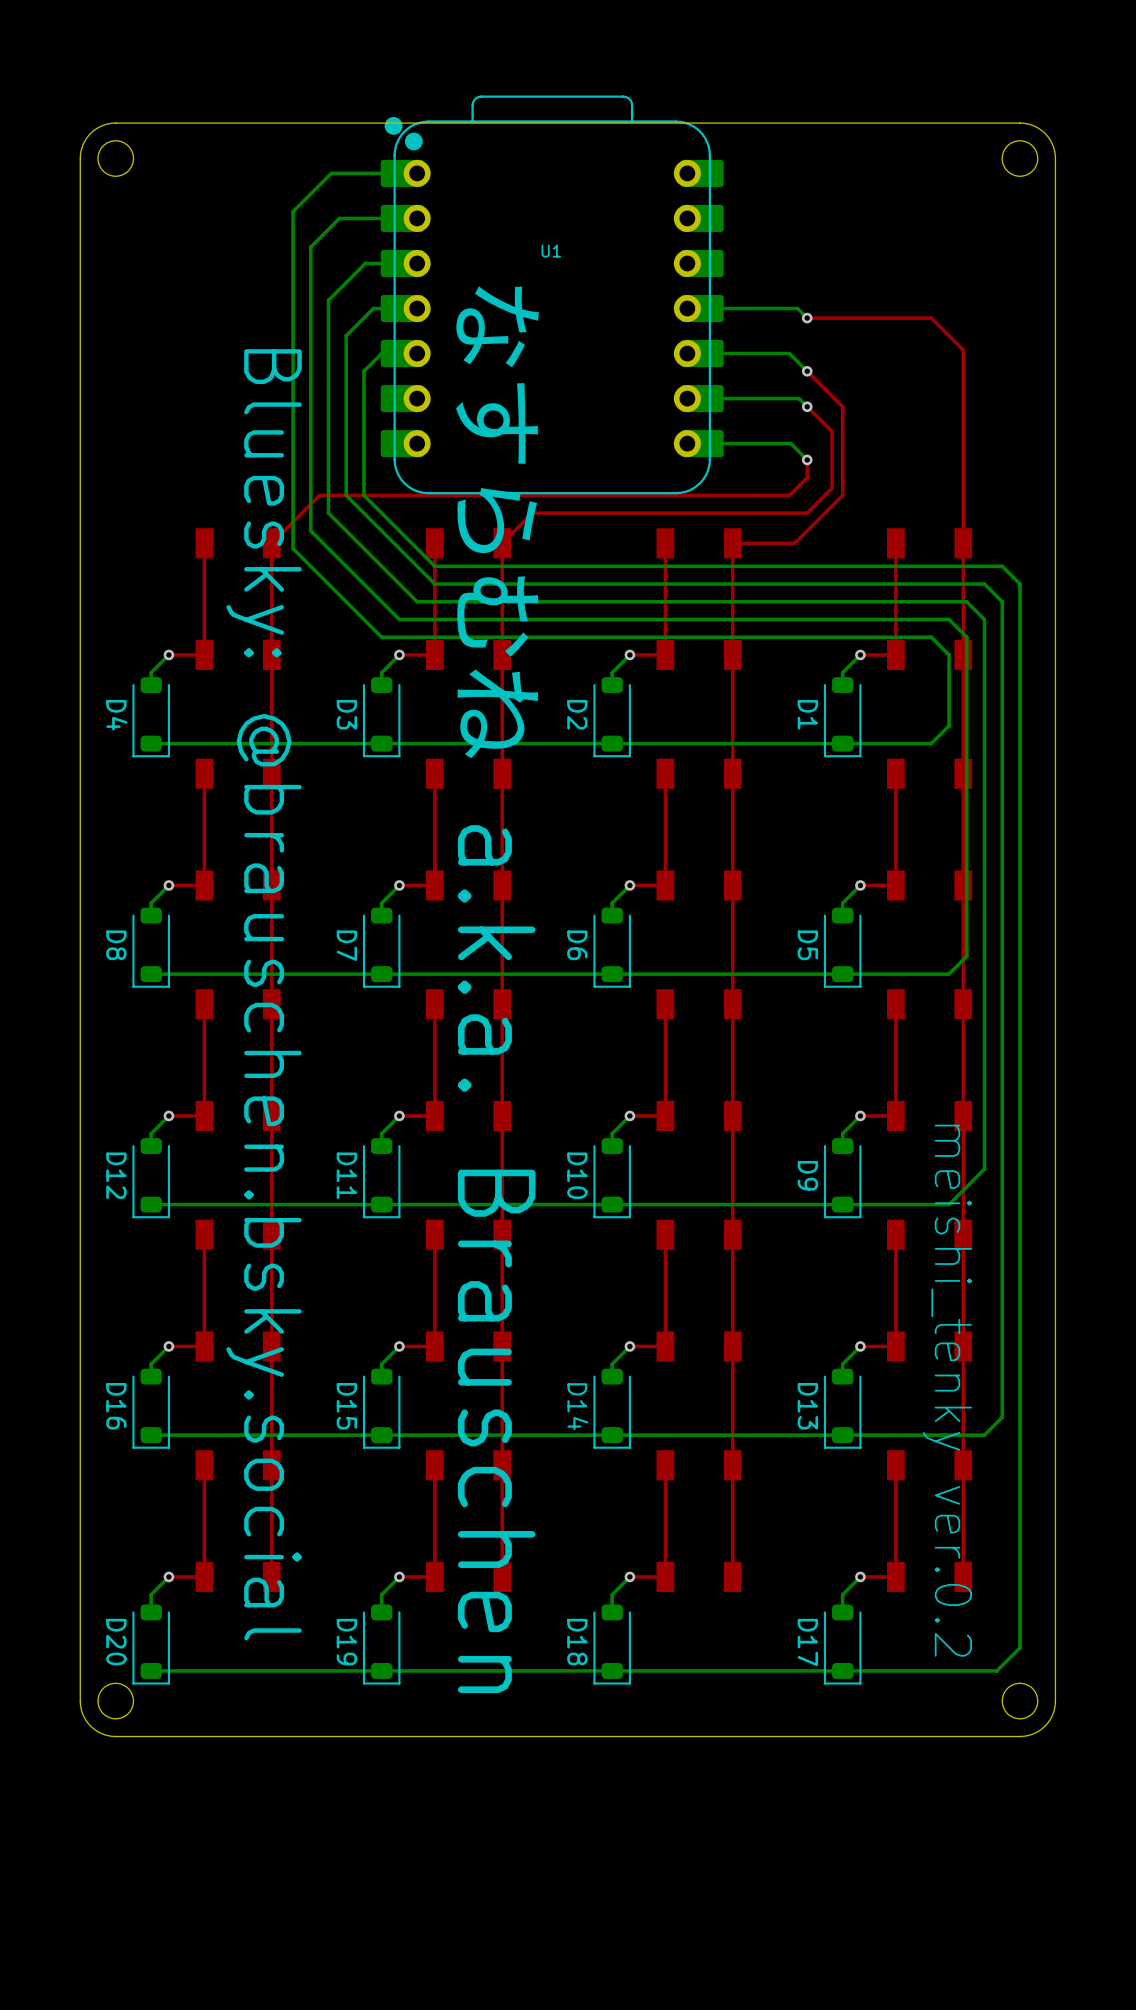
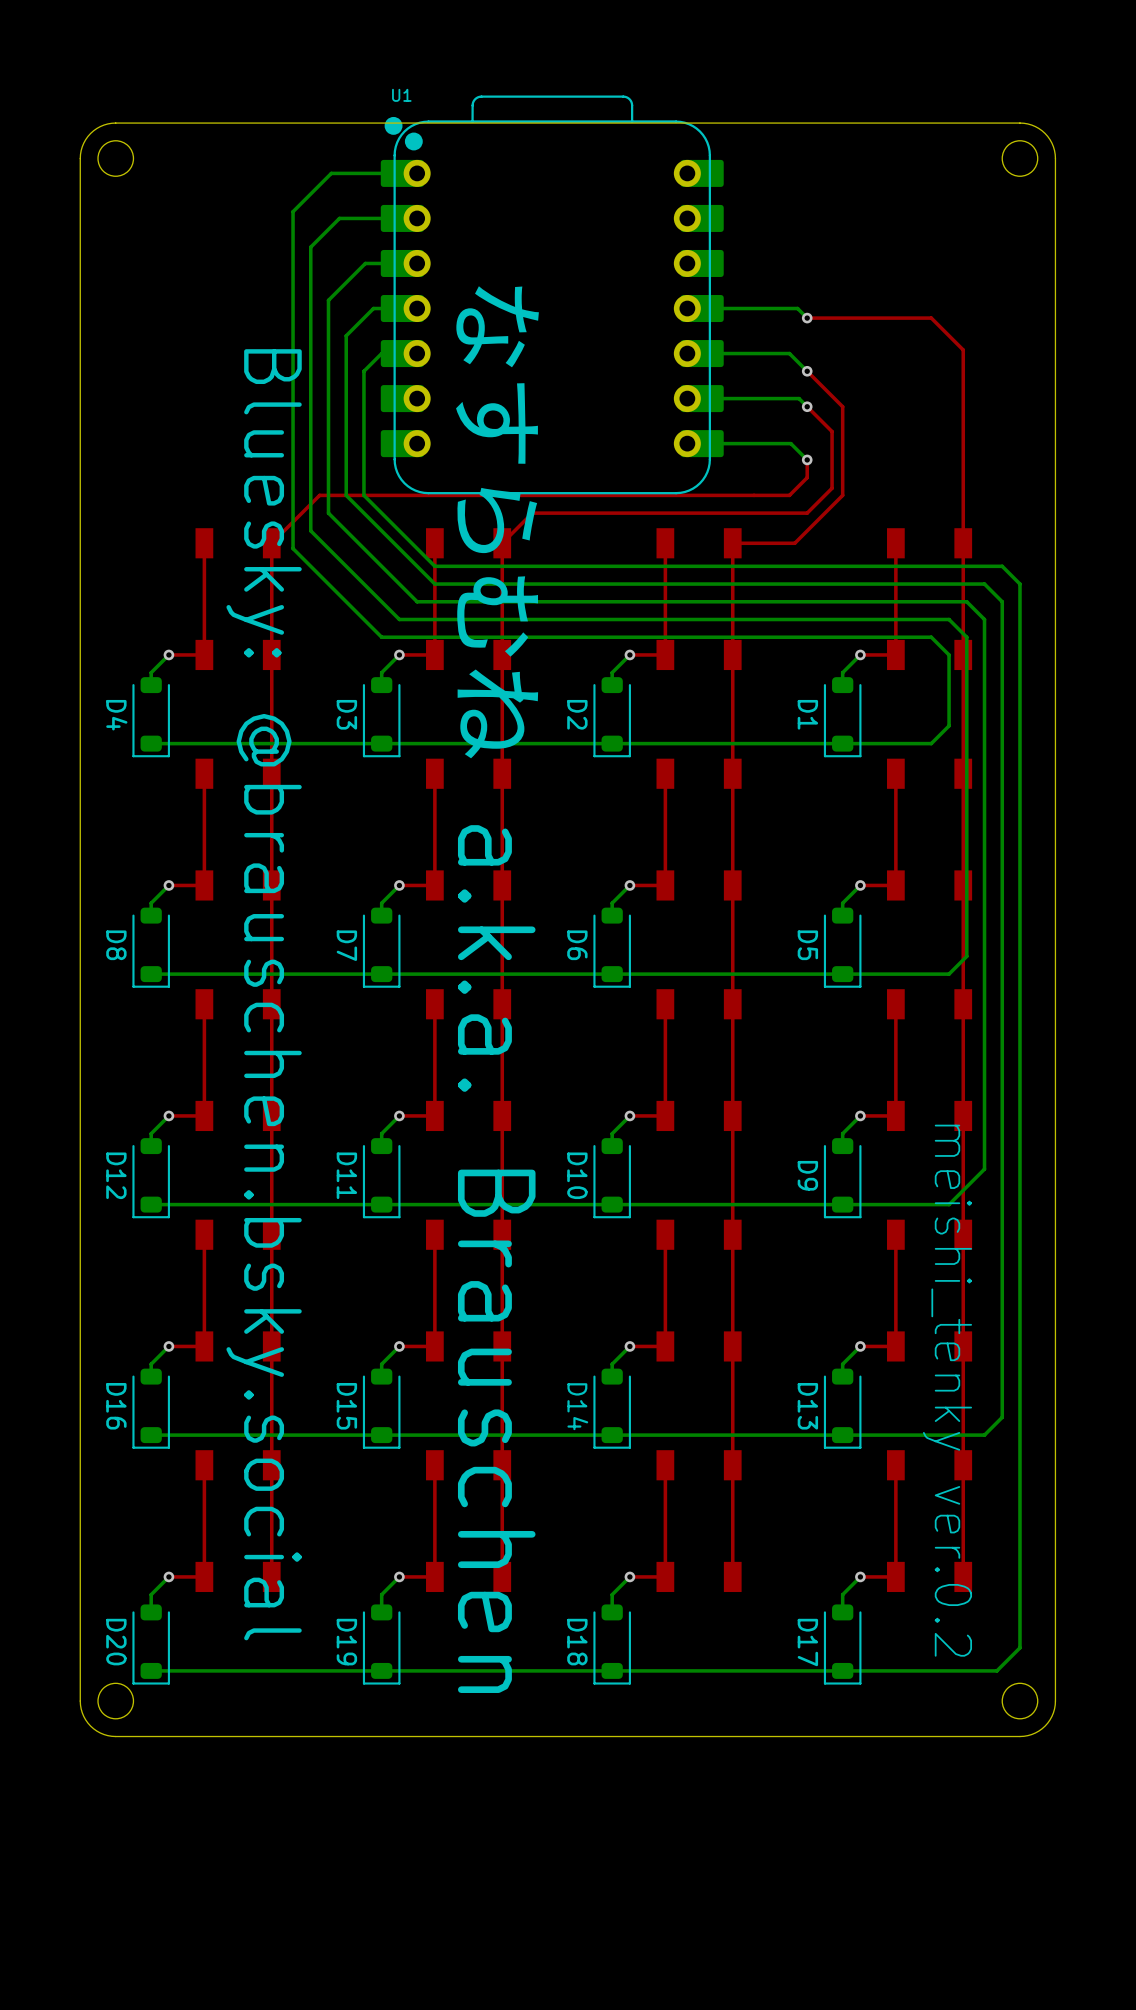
U1 name position: U1 (551, 251) -> U1 (401, 95)

